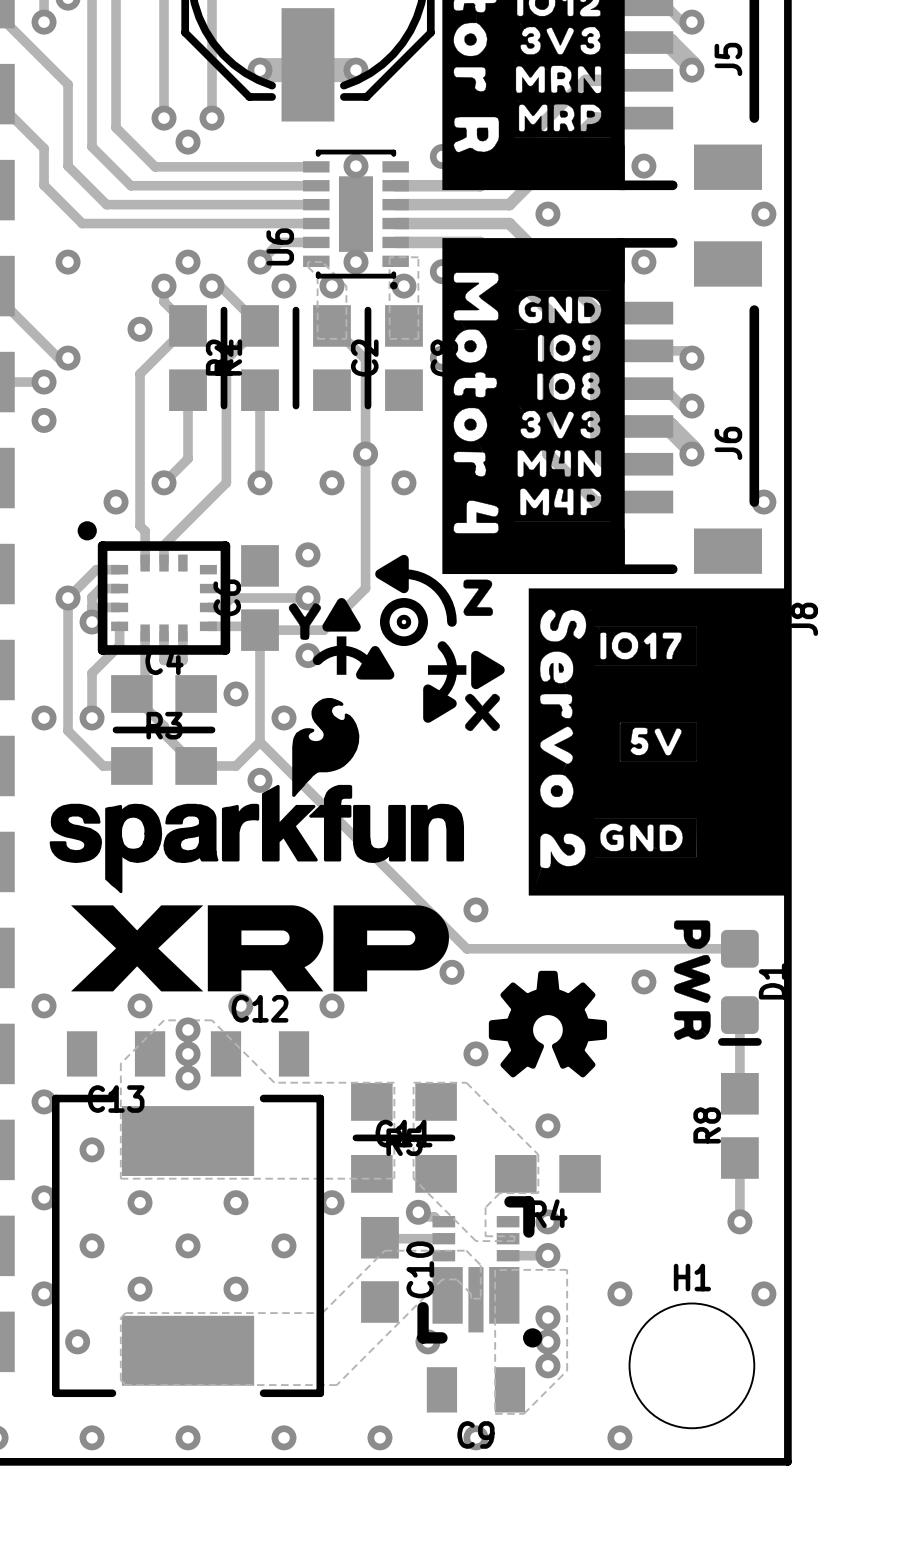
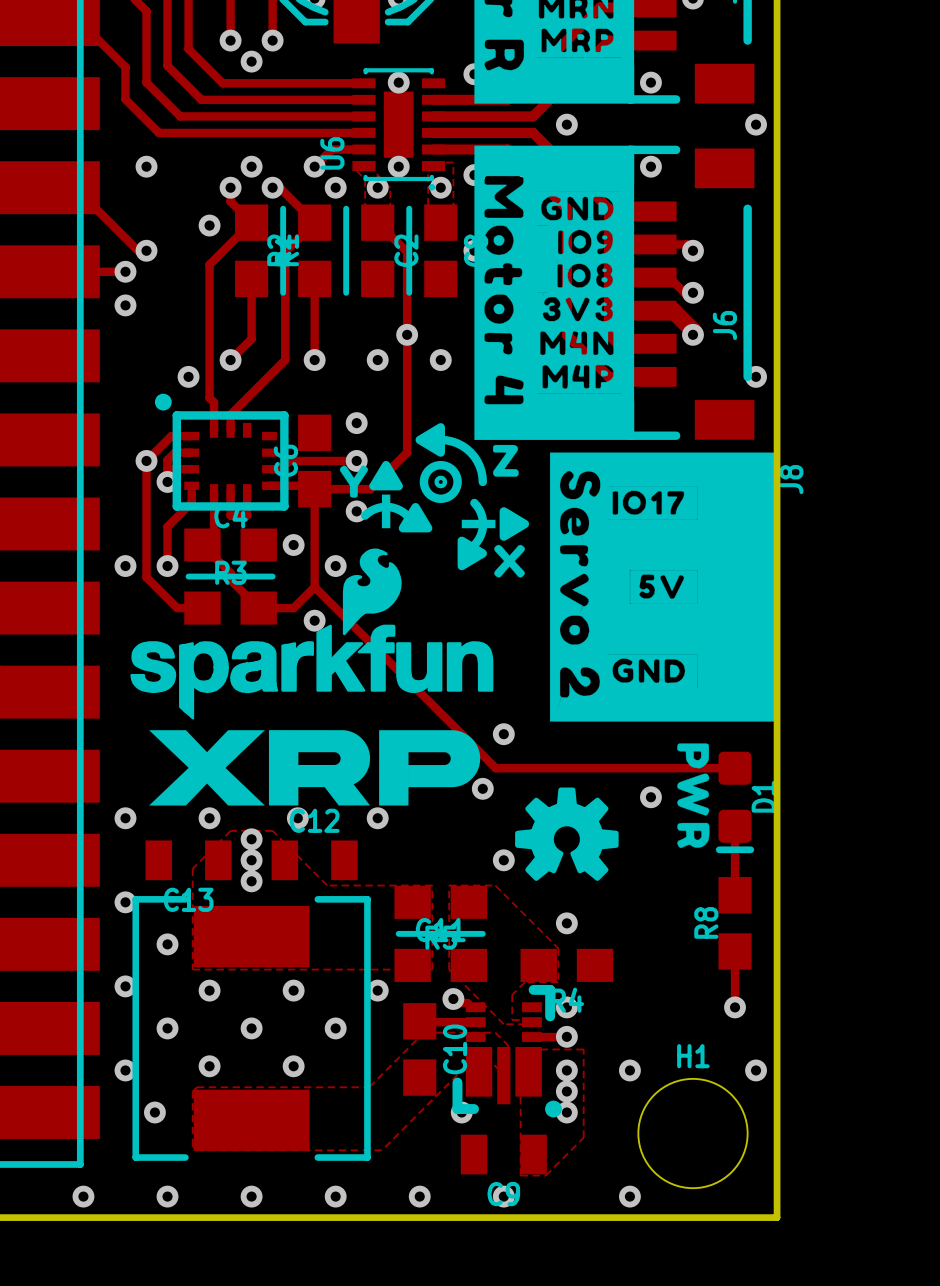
via position: (547, 1365) -> (566, 1070)

